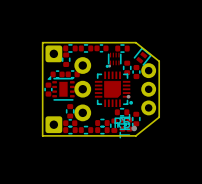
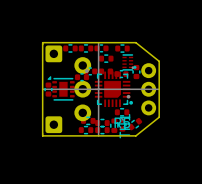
line: none -> (98, 42) (98, 135)
part: (142, 56) -> none
part: none -> (106, 58)
part: (66, 59) -> none
part: (113, 60) -> none
part: none -> (129, 62)
part: (127, 67) -> none
part: none -> (86, 71)
part: none -> (90, 71)
part: none -> (105, 71)
part: (57, 74) -> none
part: (72, 74) -> none
part: none -> (121, 74)
part: none -> (82, 77)
line: none -> (42, 89) (159, 89)
part: (70, 111) -> none
part: (136, 119) -> none
part: none -> (88, 120)
part: (70, 123) -> none
part: (129, 124) -> none
part: none -> (135, 124)
part: (134, 128) -> none
part: (70, 130) -> none

